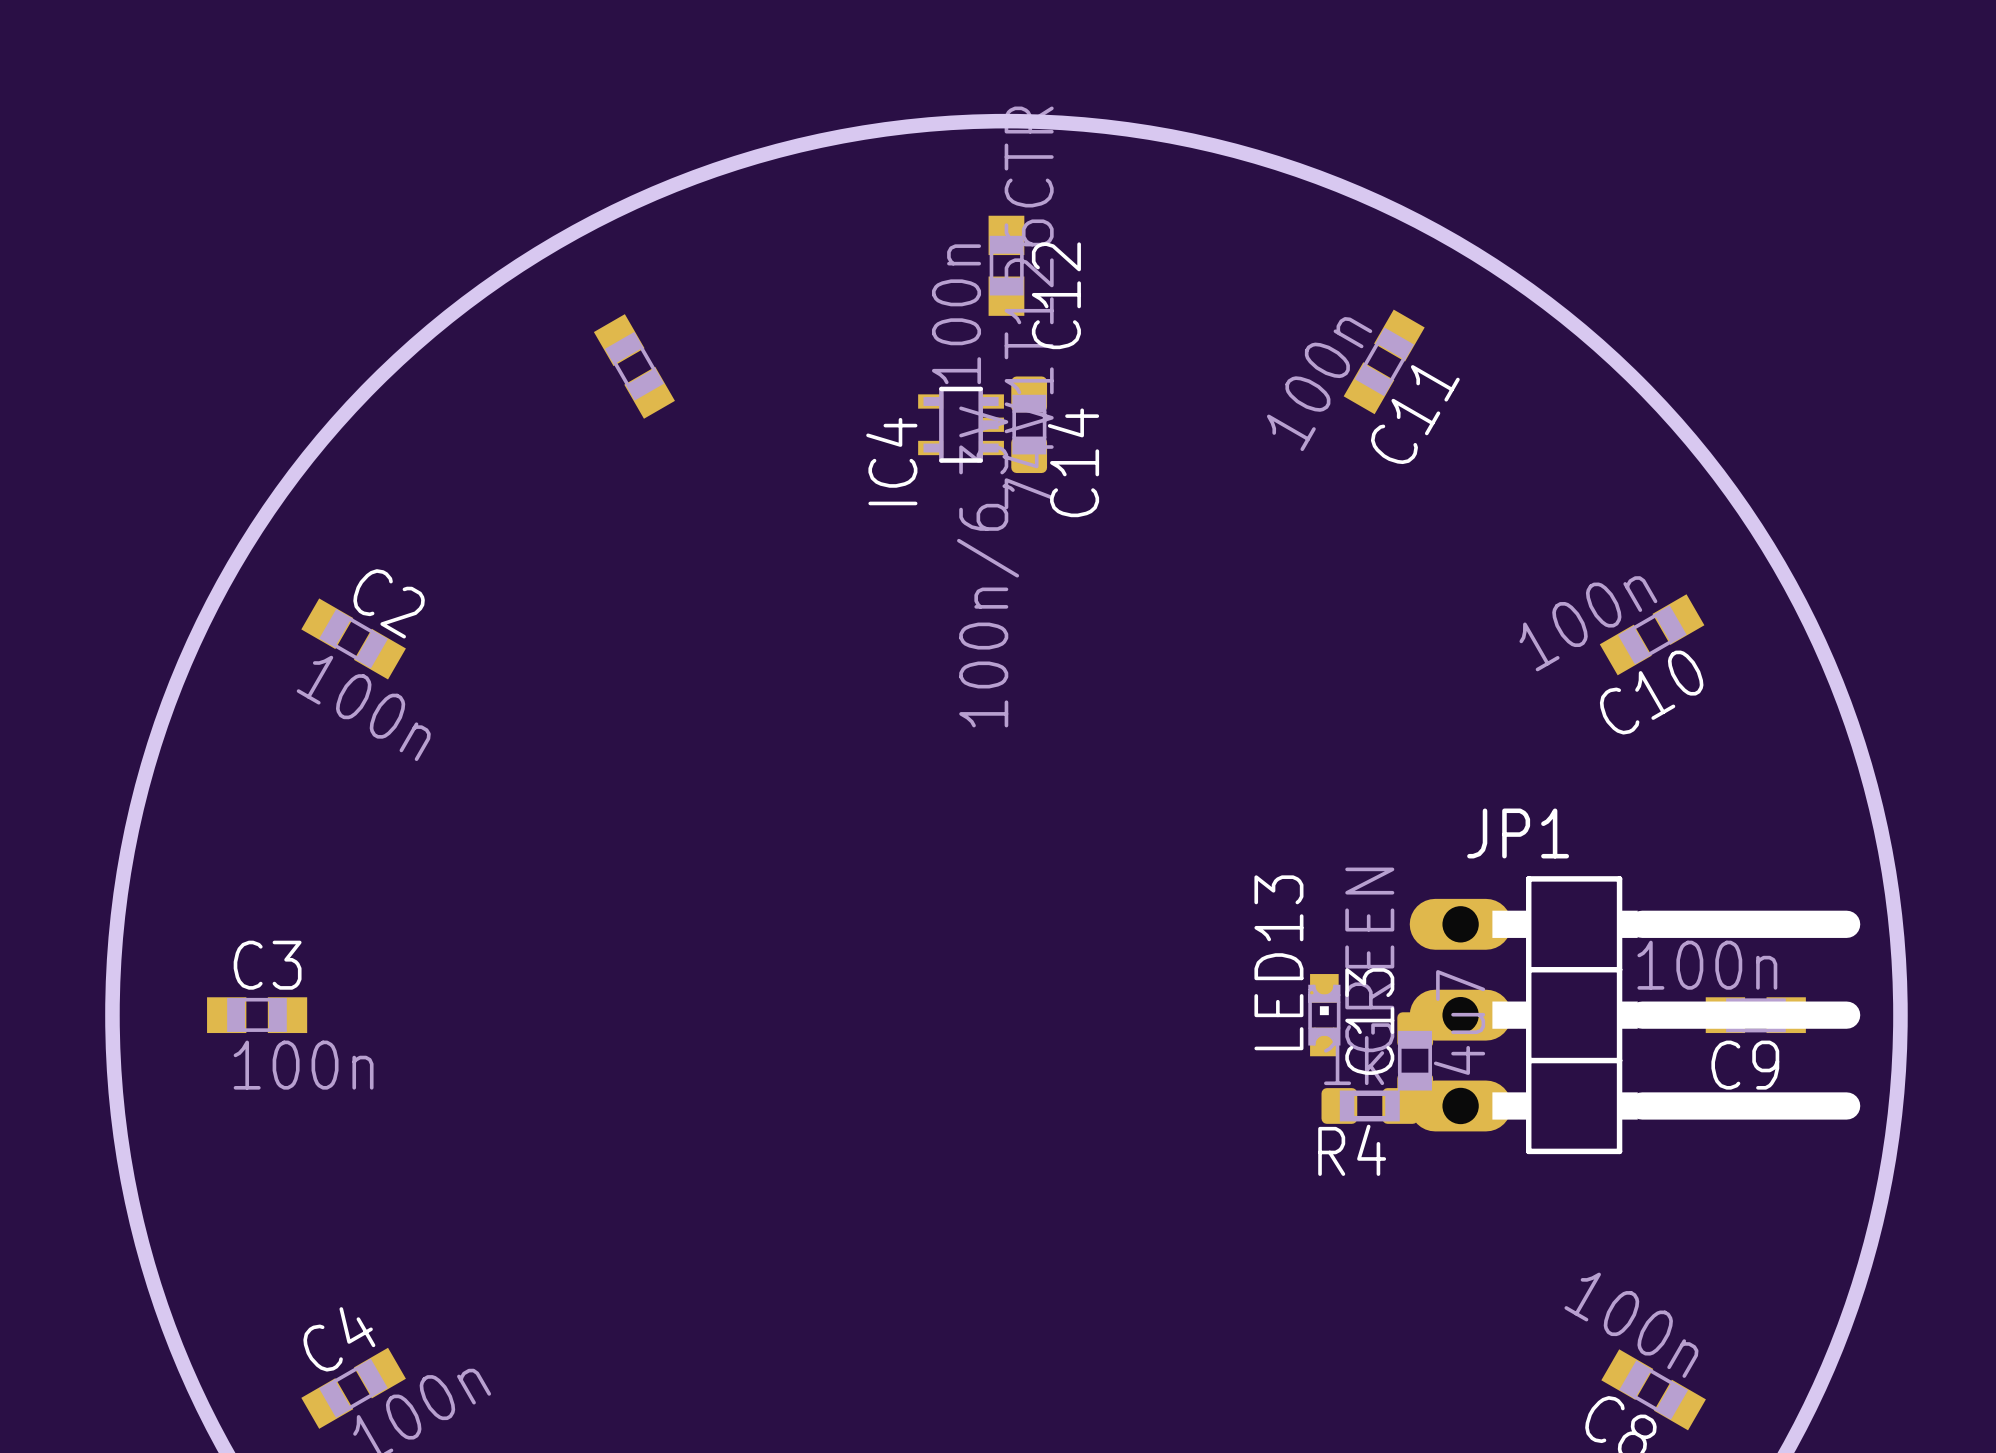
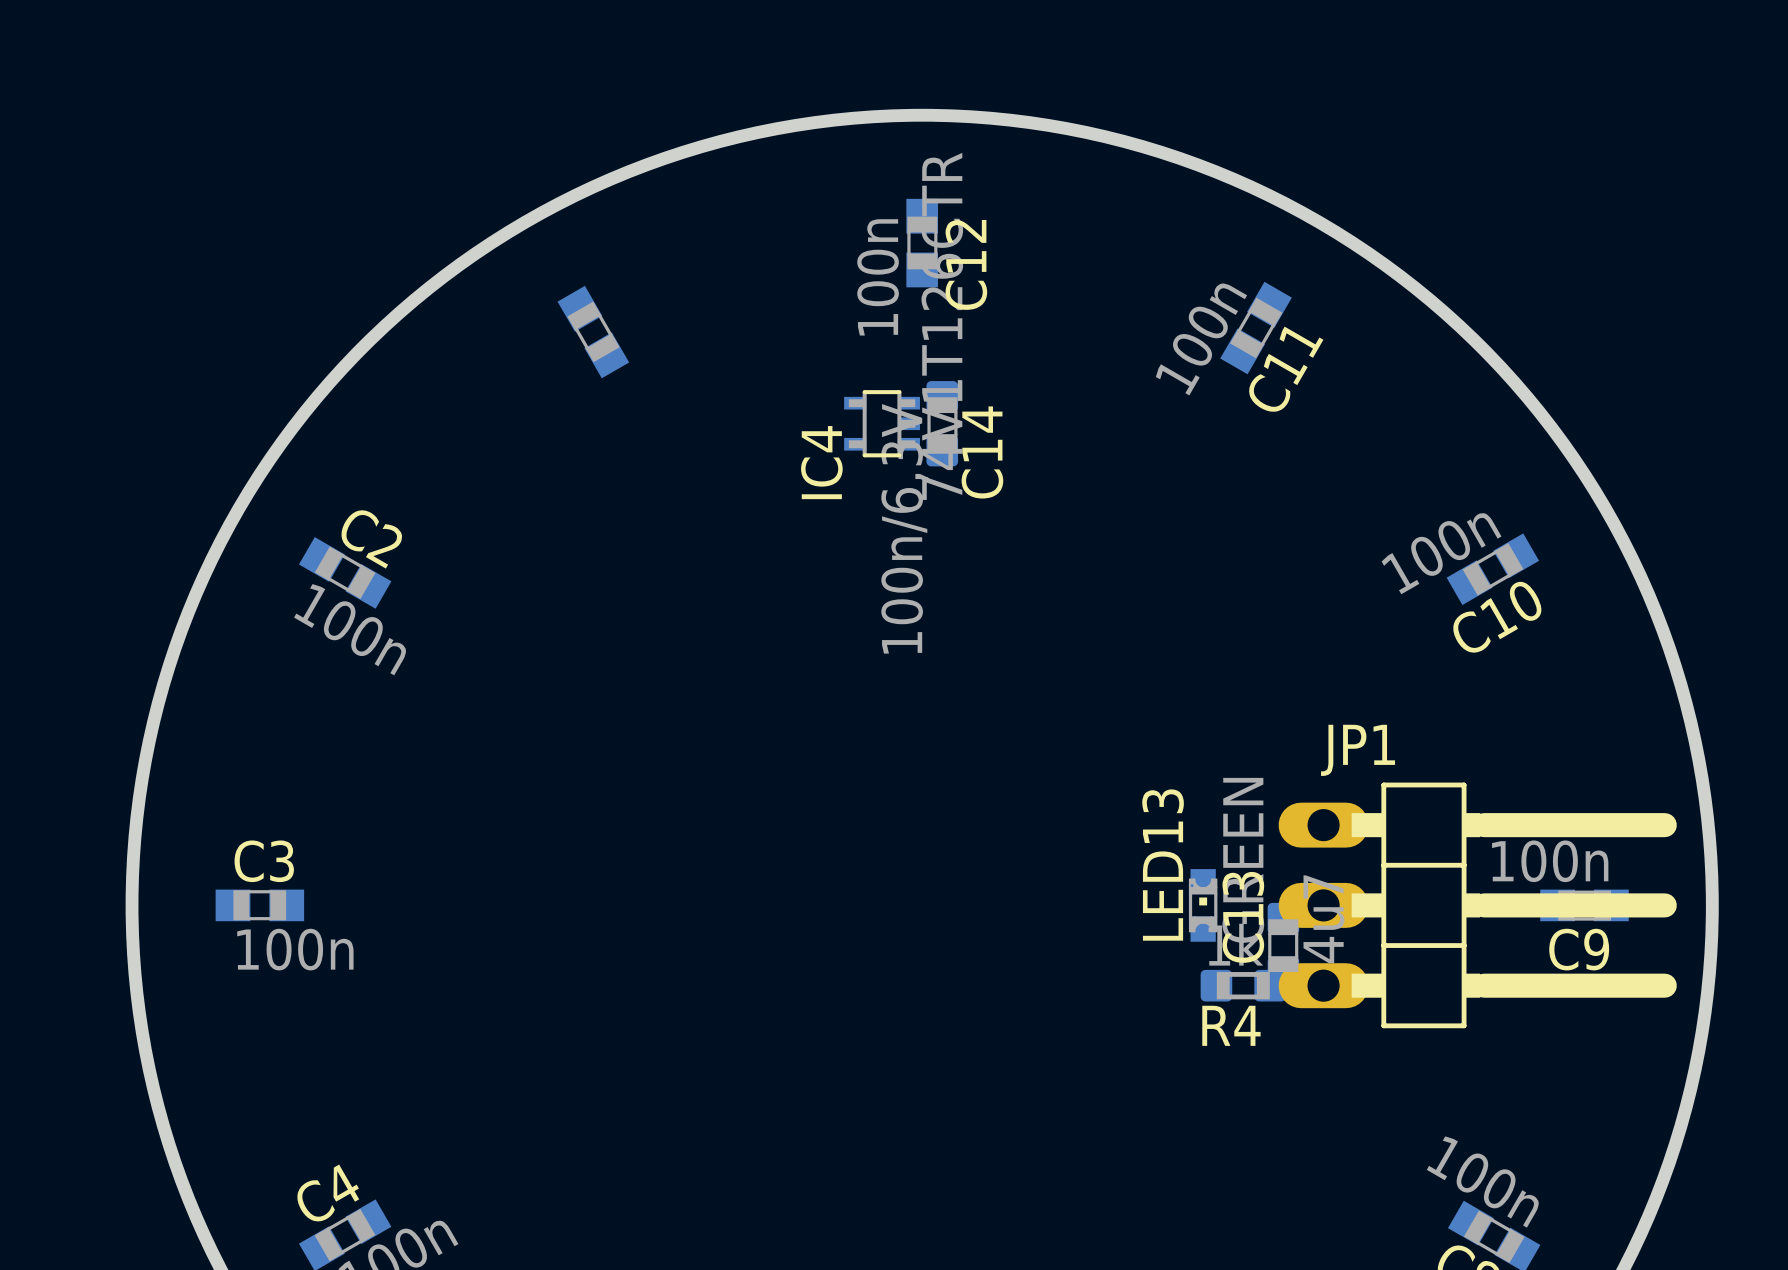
IC4 position: (961, 424) -> (882, 423)
C14 position: (1029, 424) -> (942, 423)

